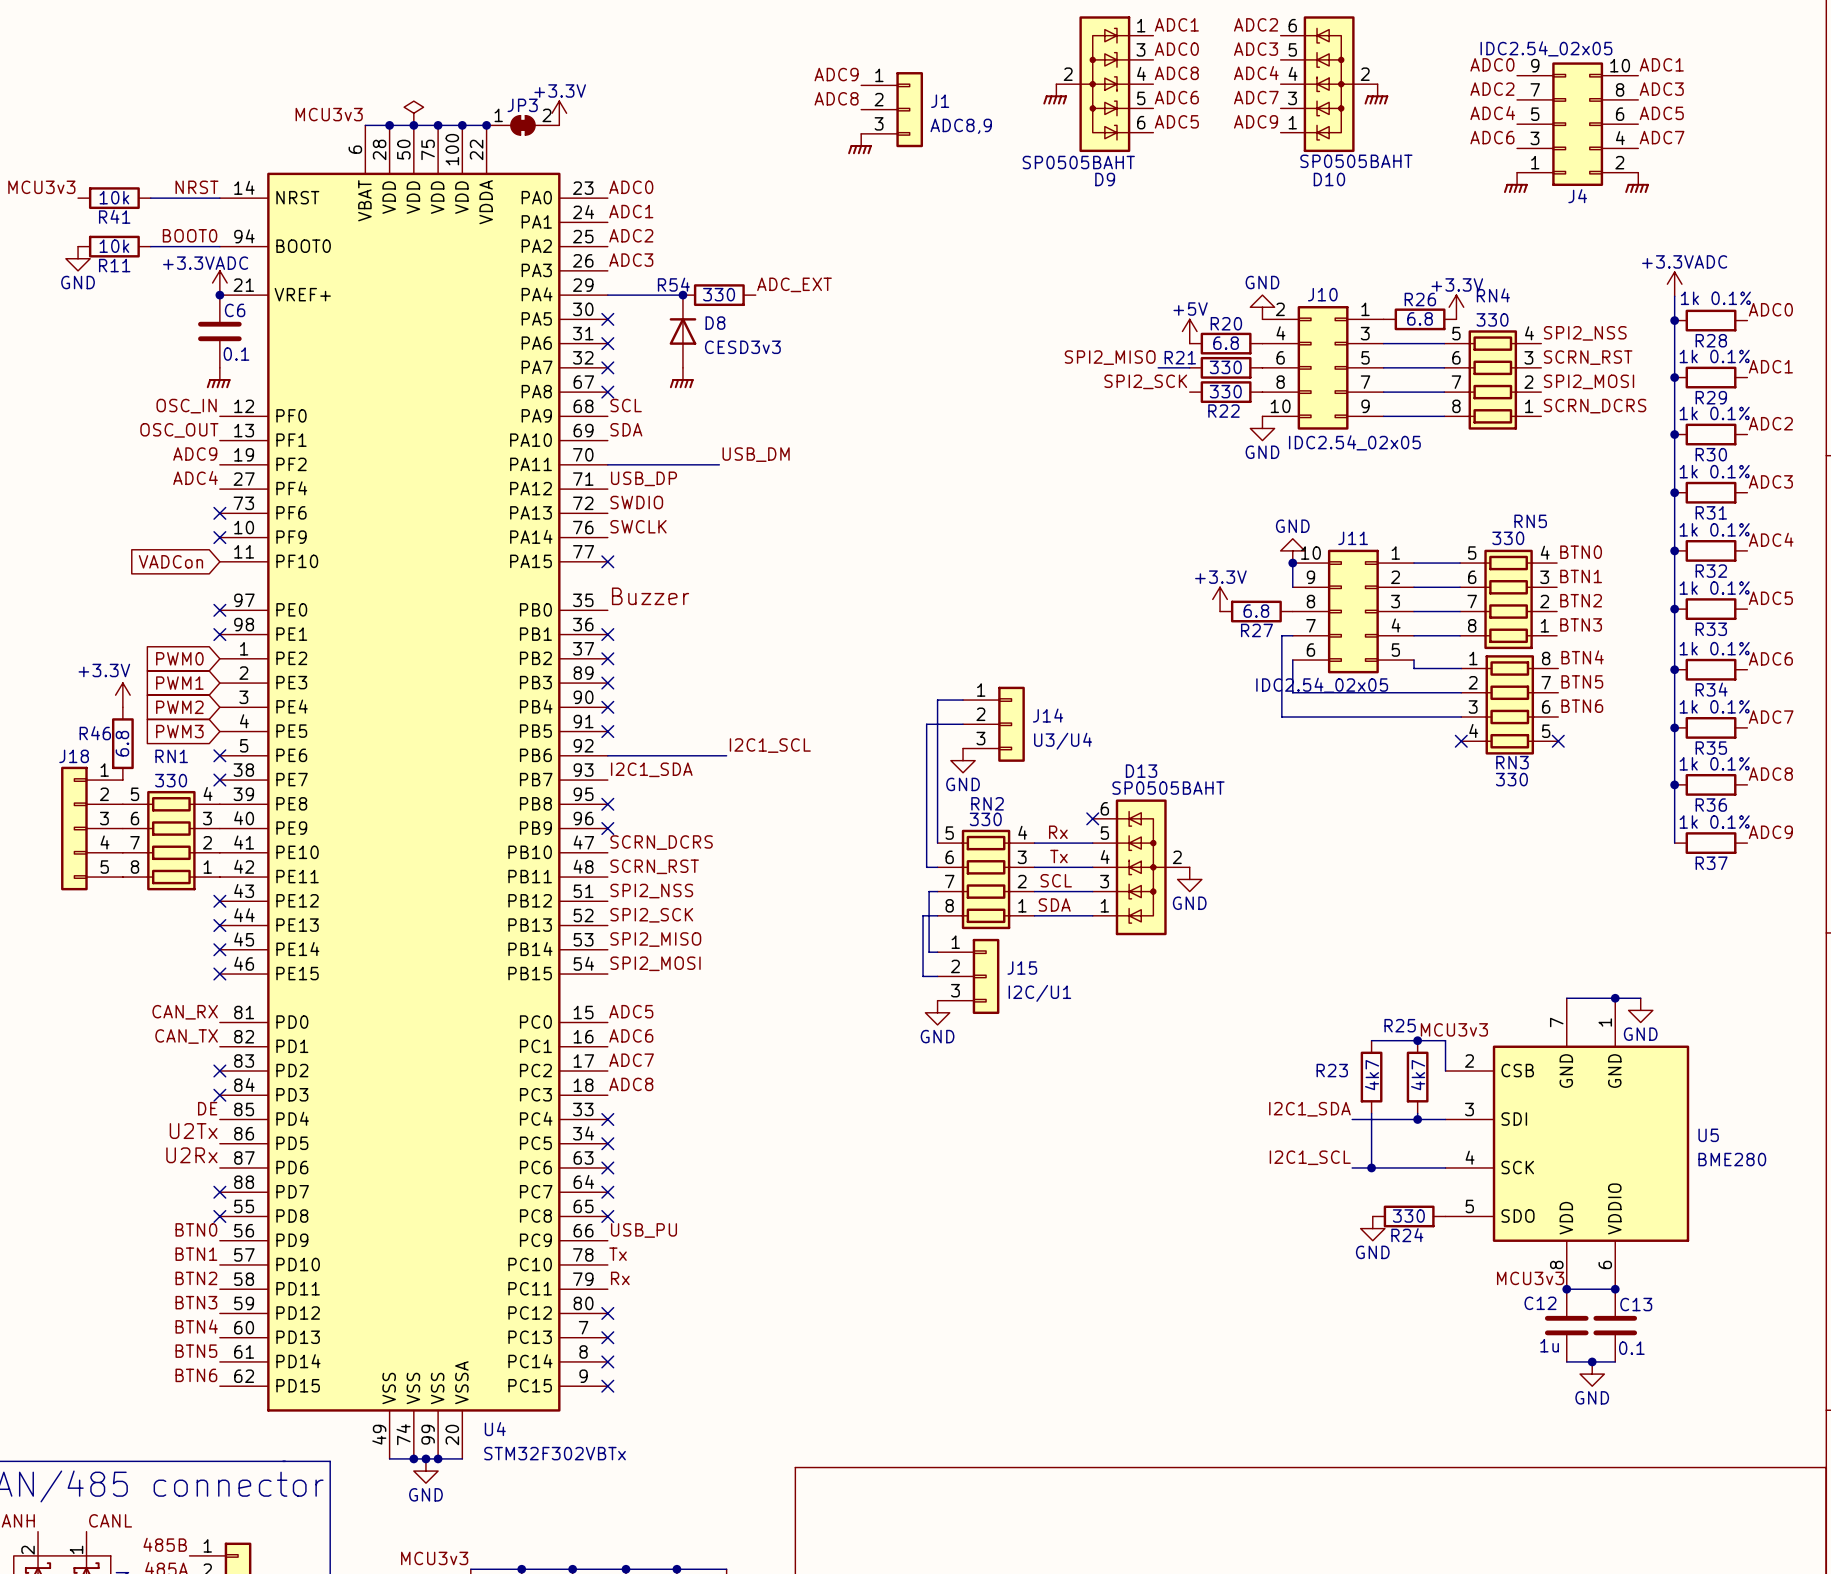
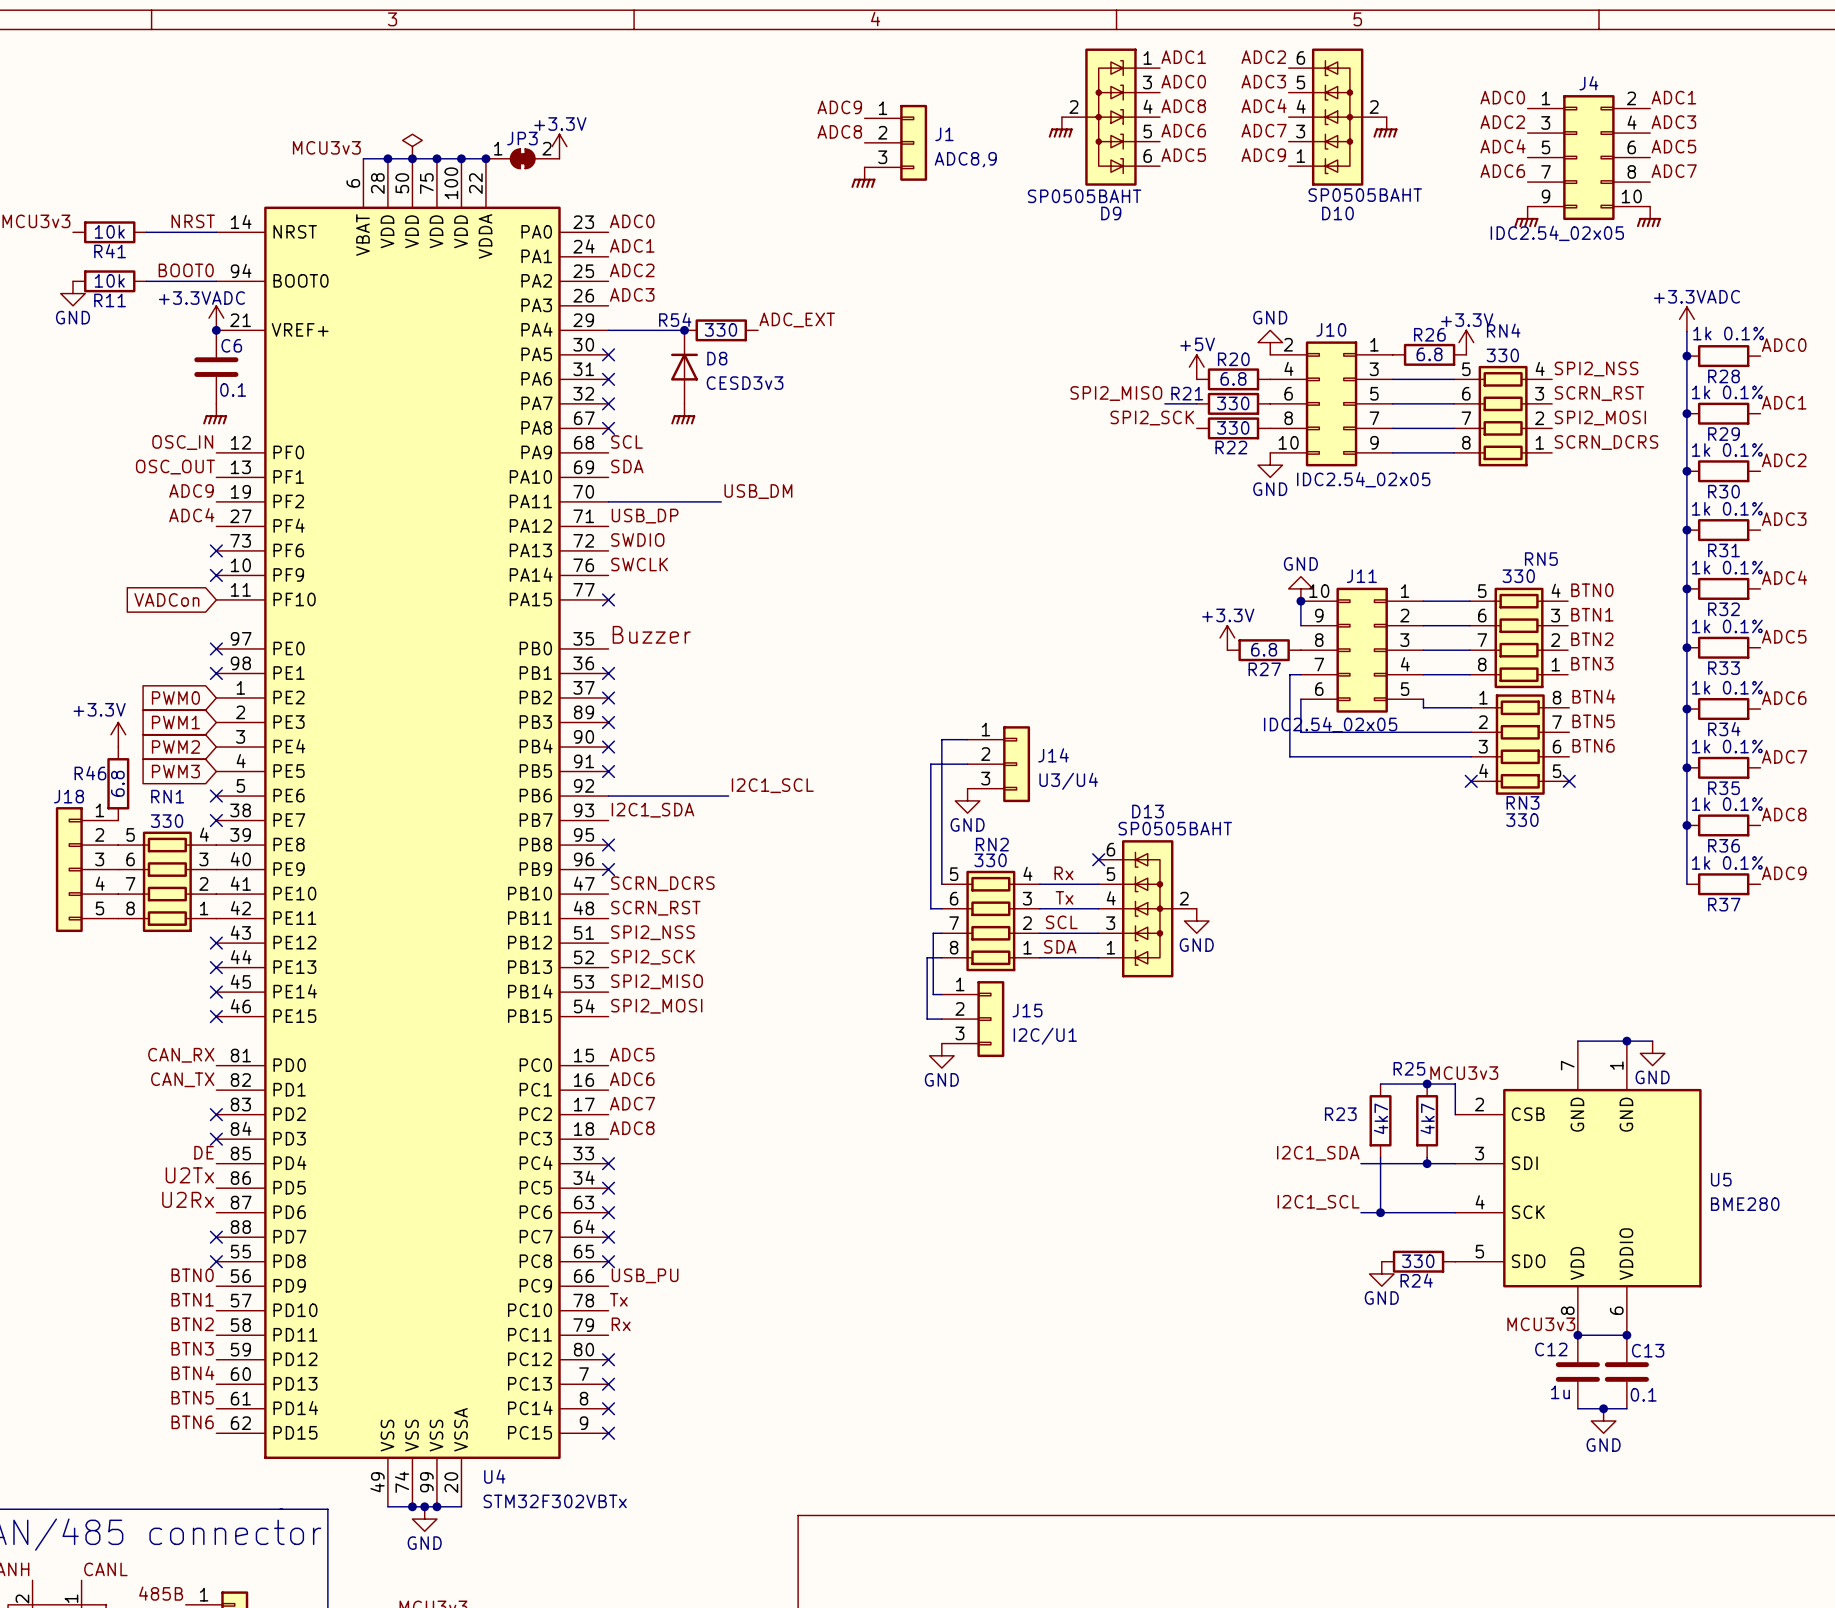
J4 flip: as is (1577, 124) -> up-down (1588, 157)

